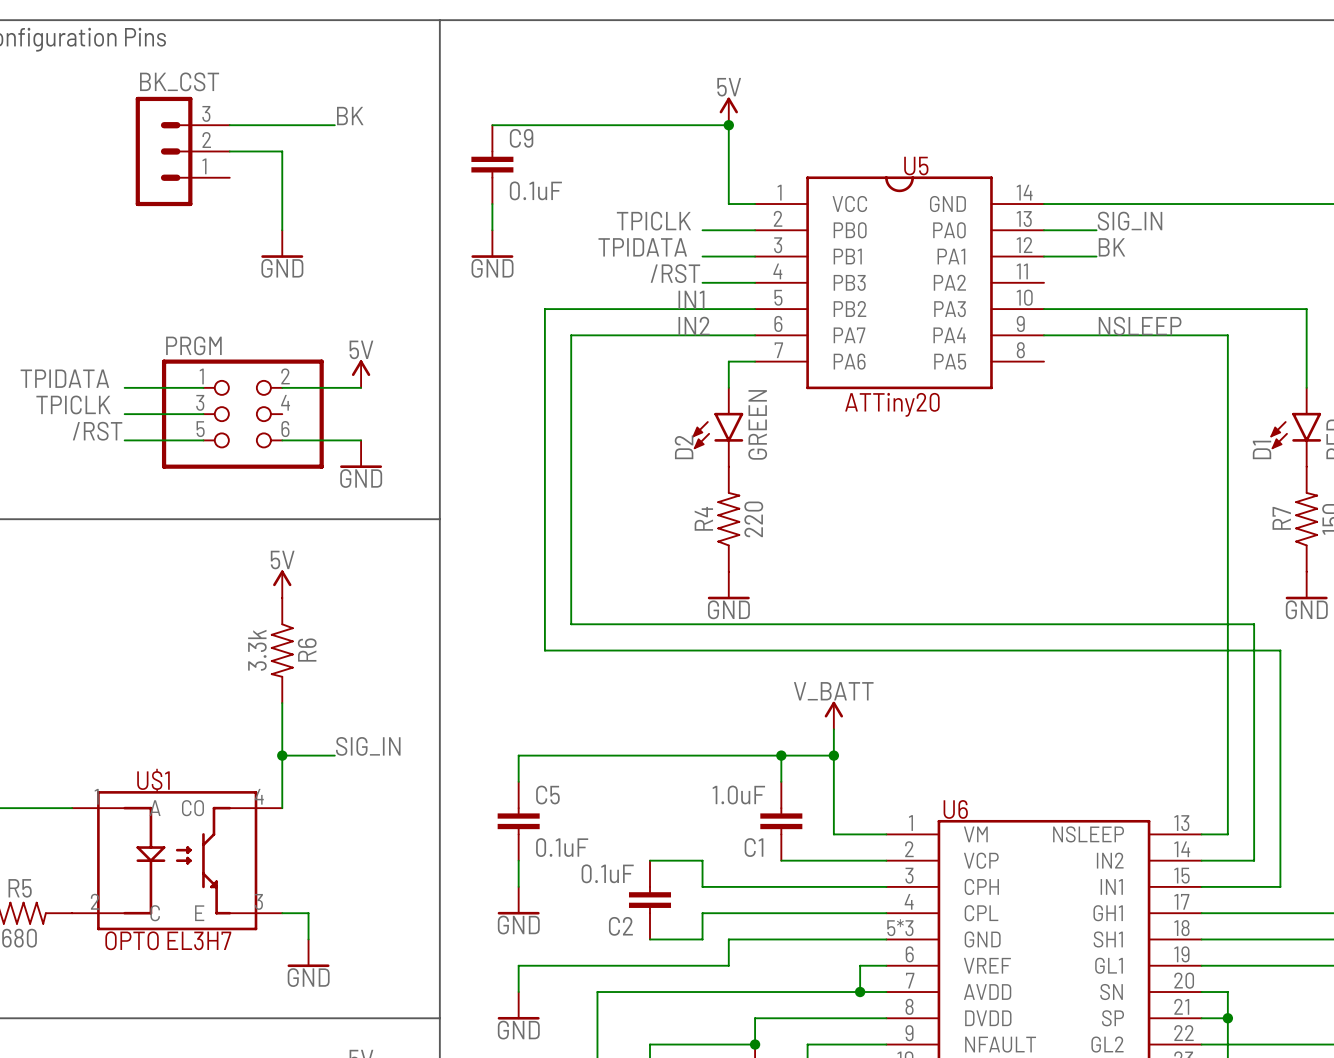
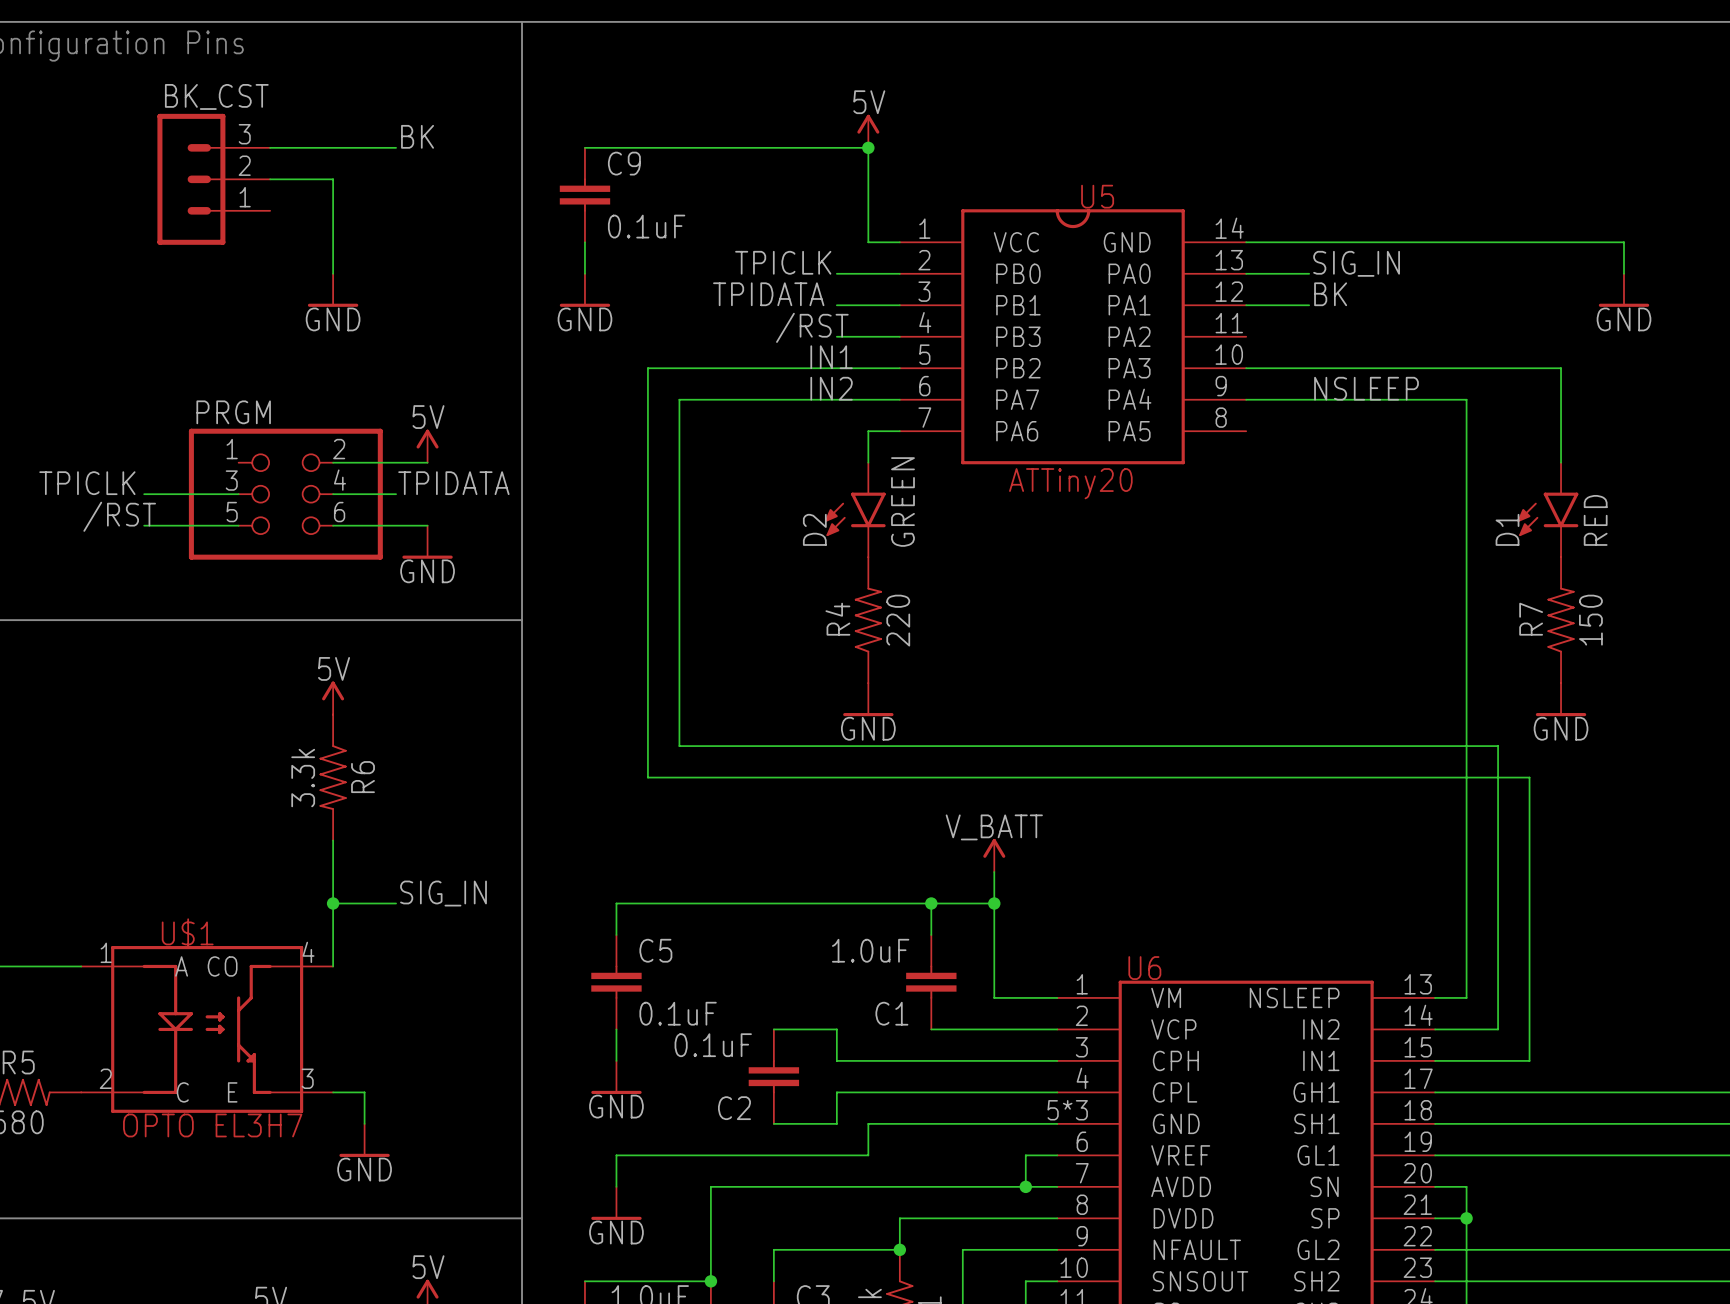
label: TPIDATA (64, 378) -> none
wire: (124, 387) (203, 387) -> none
label: none -> TPIDATA (453, 483)
wire: none -> (333, 494) (396, 494)

